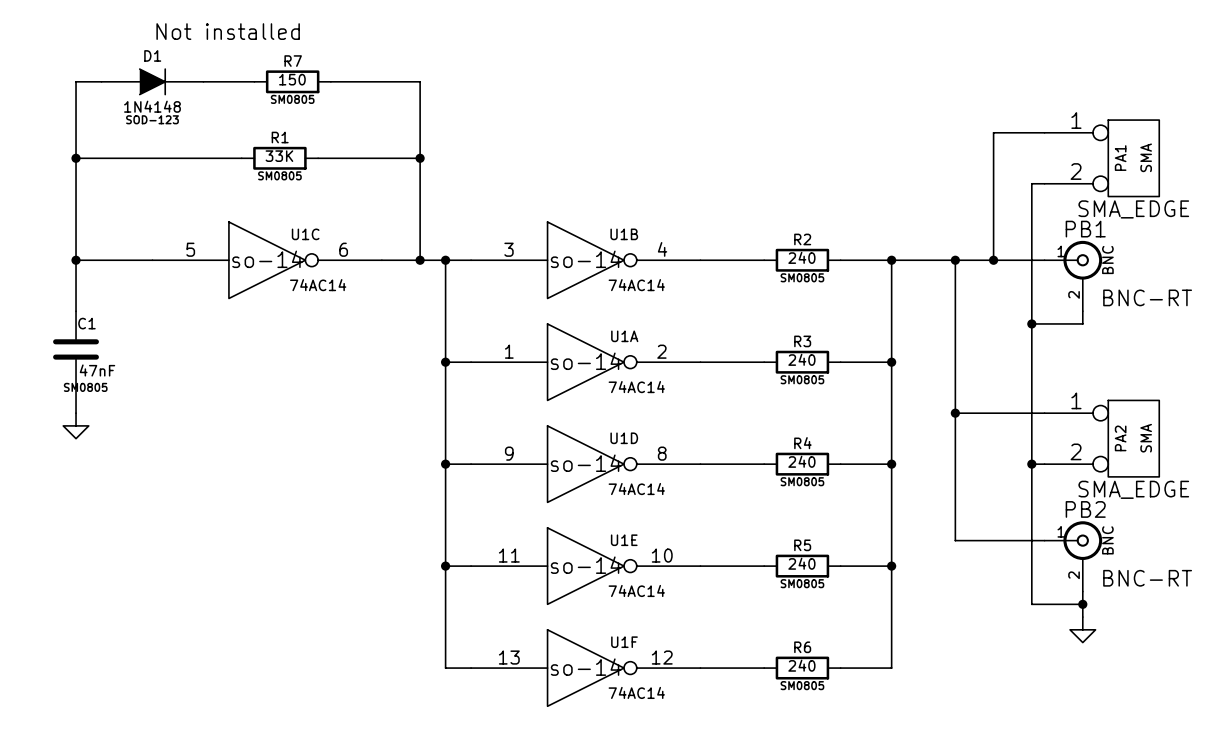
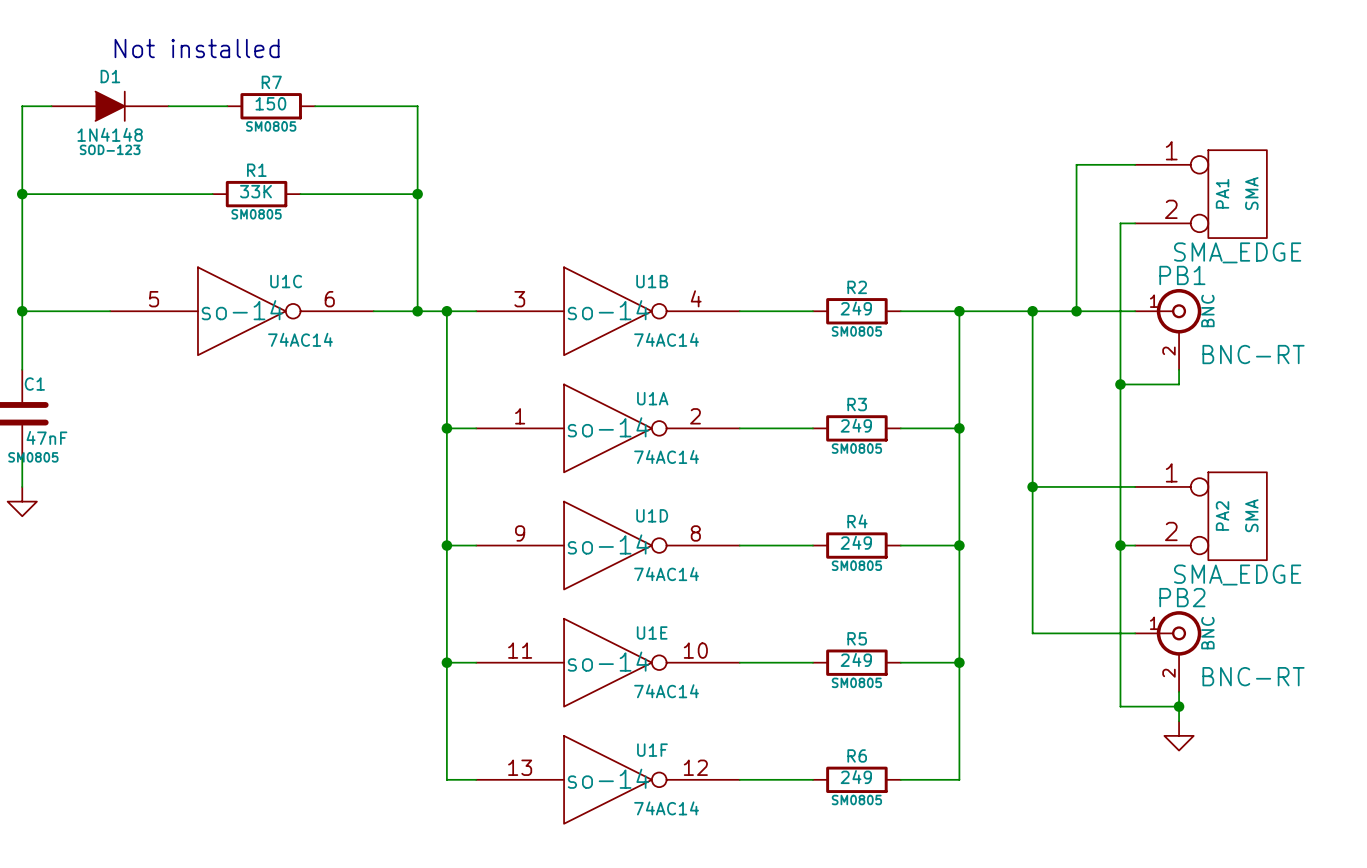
R2 value: 240 (801, 257) -> 249 (856, 308)
R3 value: 240 (801, 359) -> 249 (856, 425)
R4 value: 240 (801, 461) -> 249 (856, 542)
R5 value: 240 (801, 563) -> 249 (856, 659)
R6 value: 240 (801, 665) -> 249 (856, 777)

